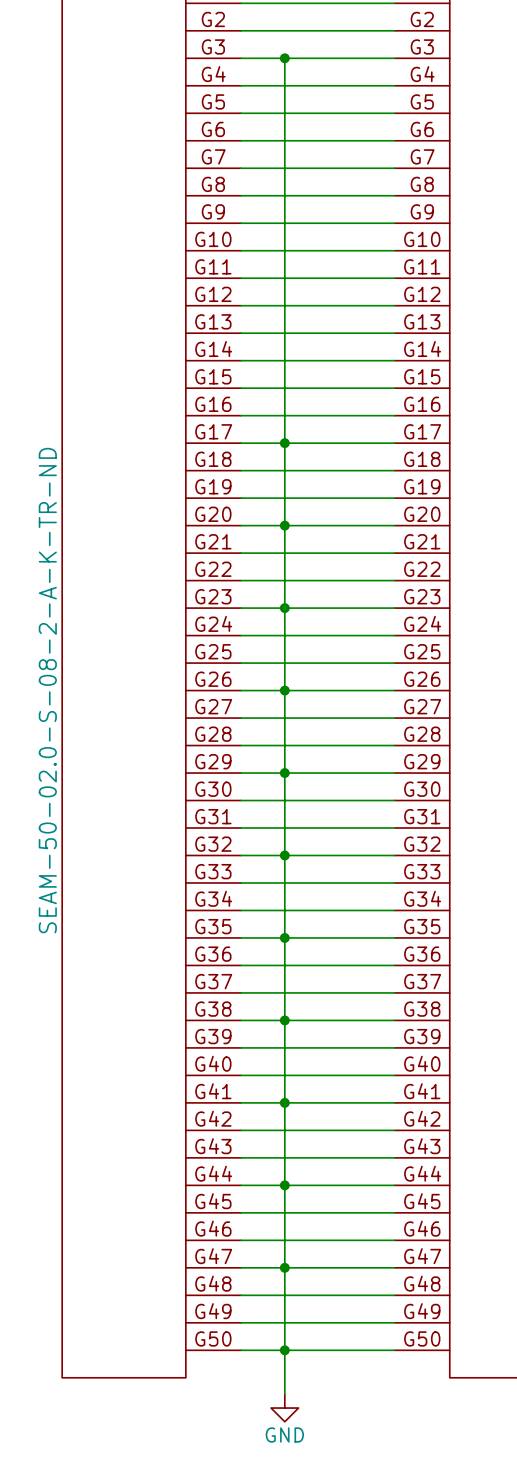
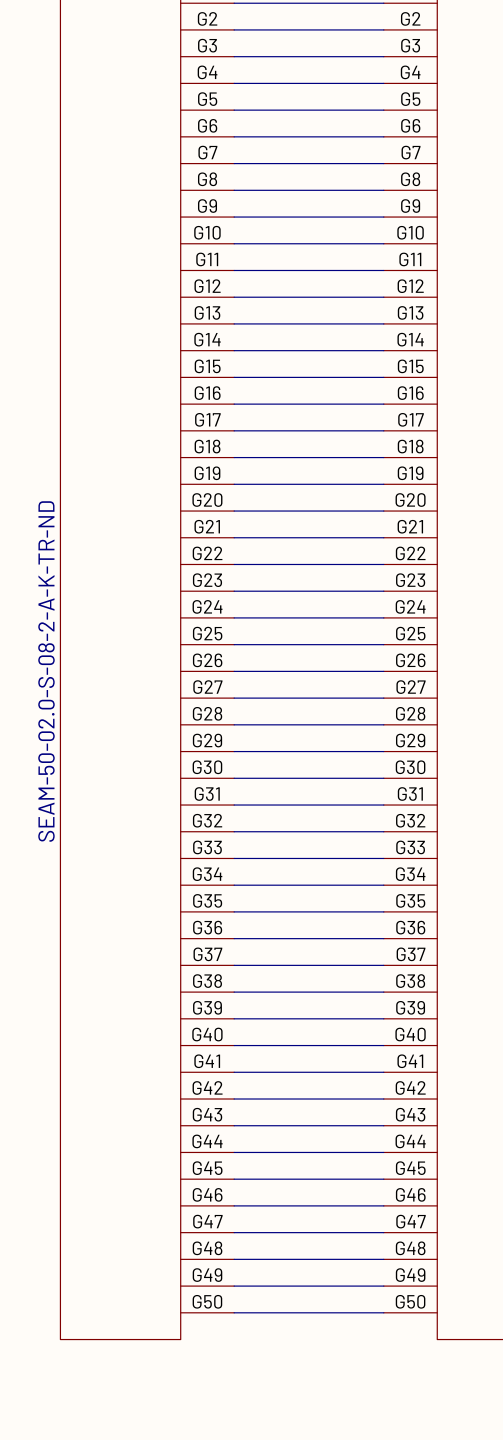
wire: (284, 58) (284, 1394) -> none
junction: (284, 58) -> none
junction: (284, 443) -> none
junction: (284, 525) -> none
junction: (284, 608) -> none
junction: (284, 690) -> none
junction: (284, 773) -> none
junction: (284, 855) -> none
junction: (284, 937) -> none
junction: (284, 1020) -> none
junction: (284, 1102) -> none
junction: (284, 1185) -> none
junction: (284, 1267) -> none
junction: (284, 1350) -> none
power symbol: GND (284, 1408) -> none

